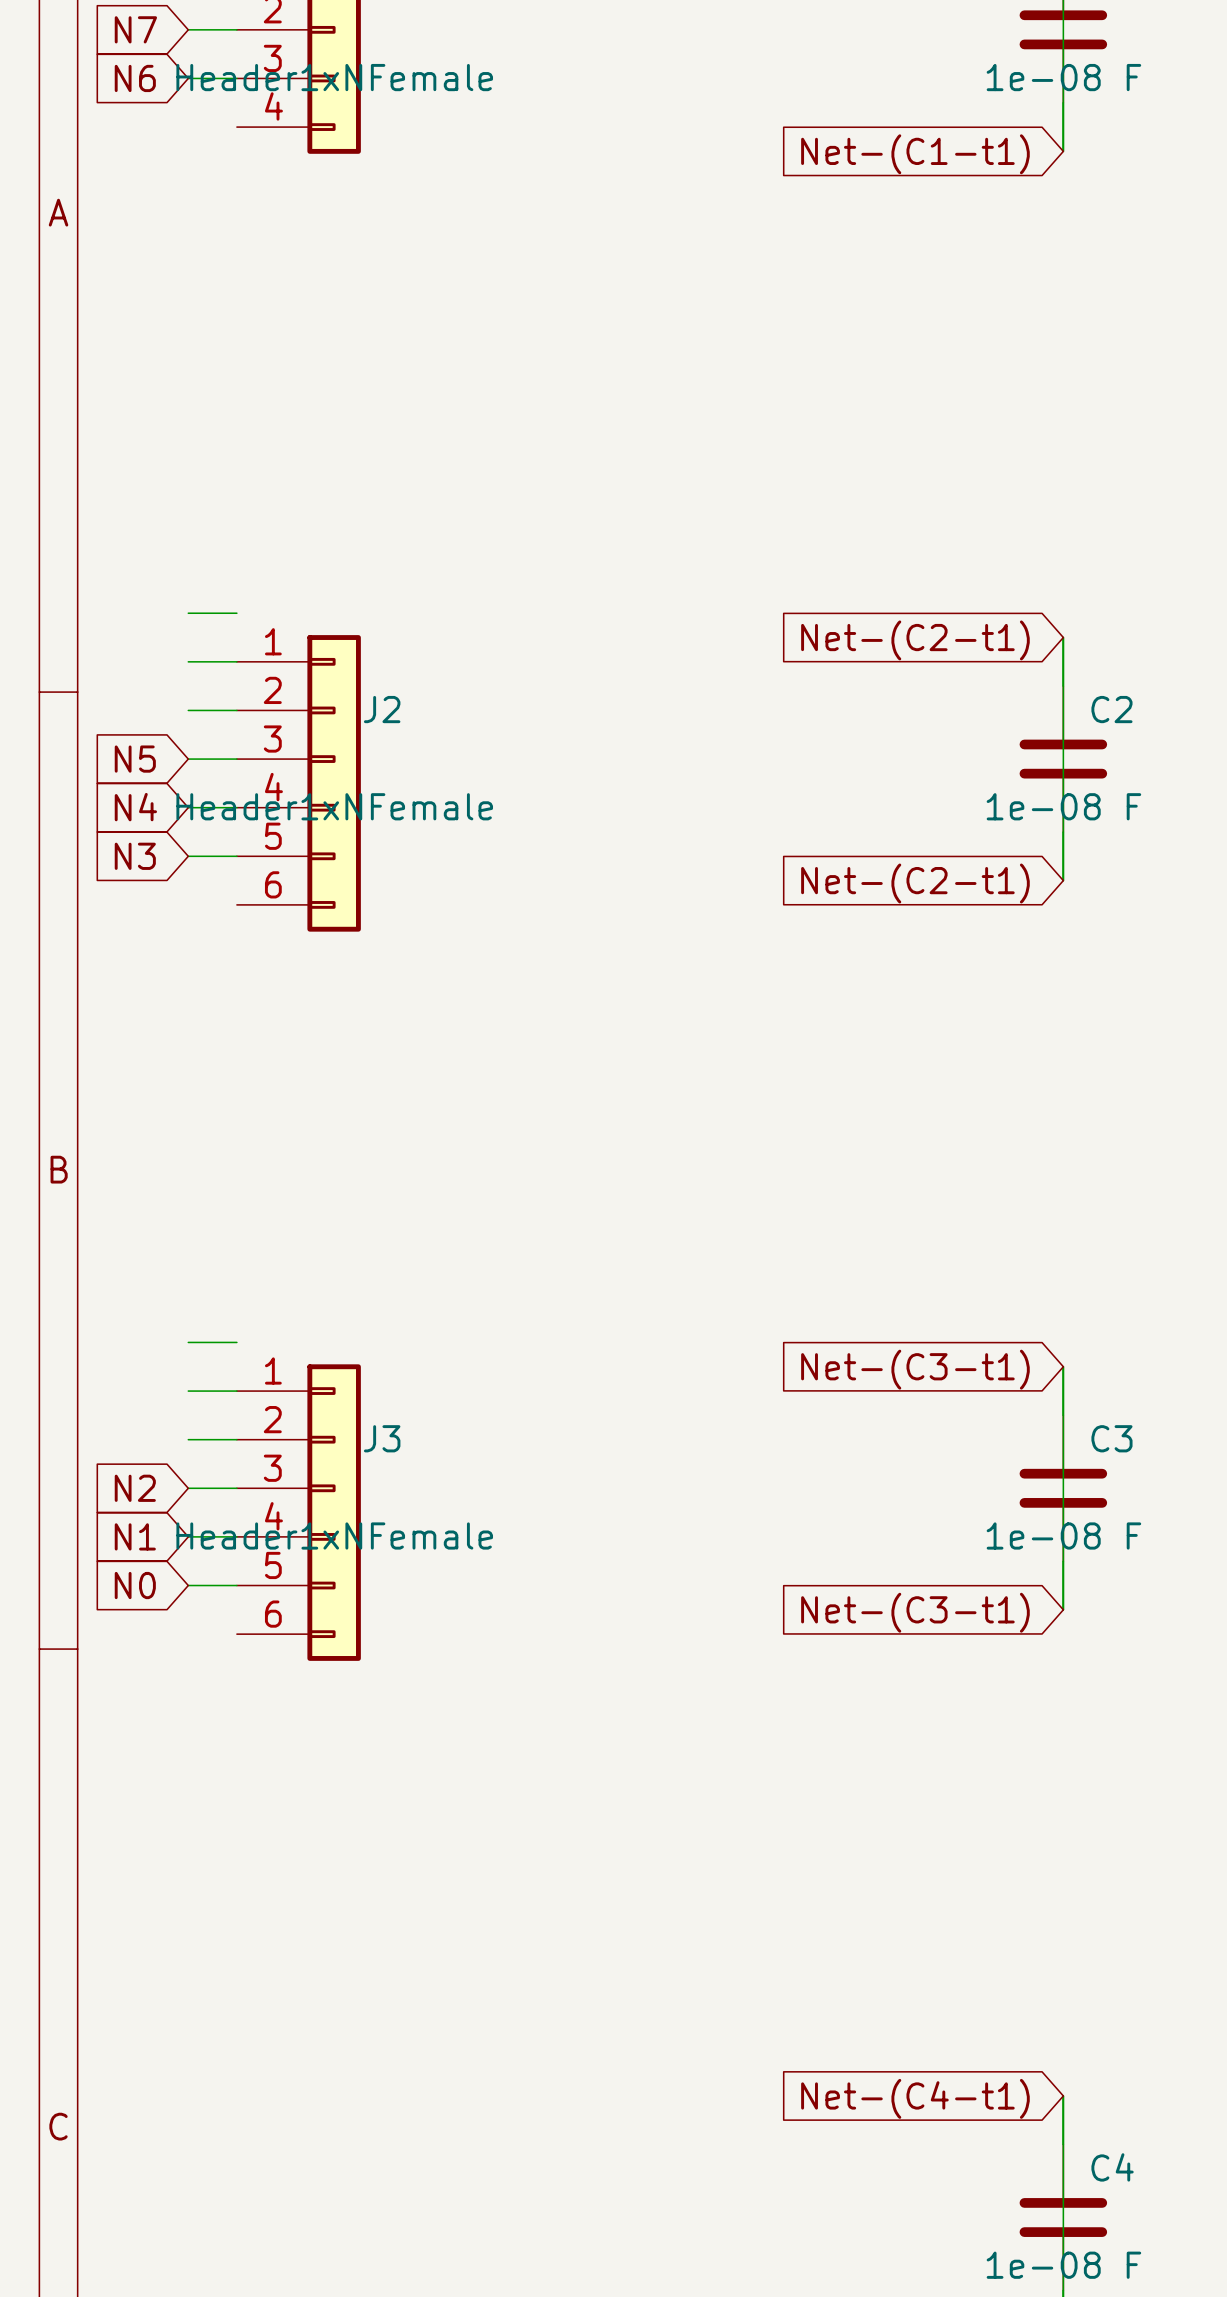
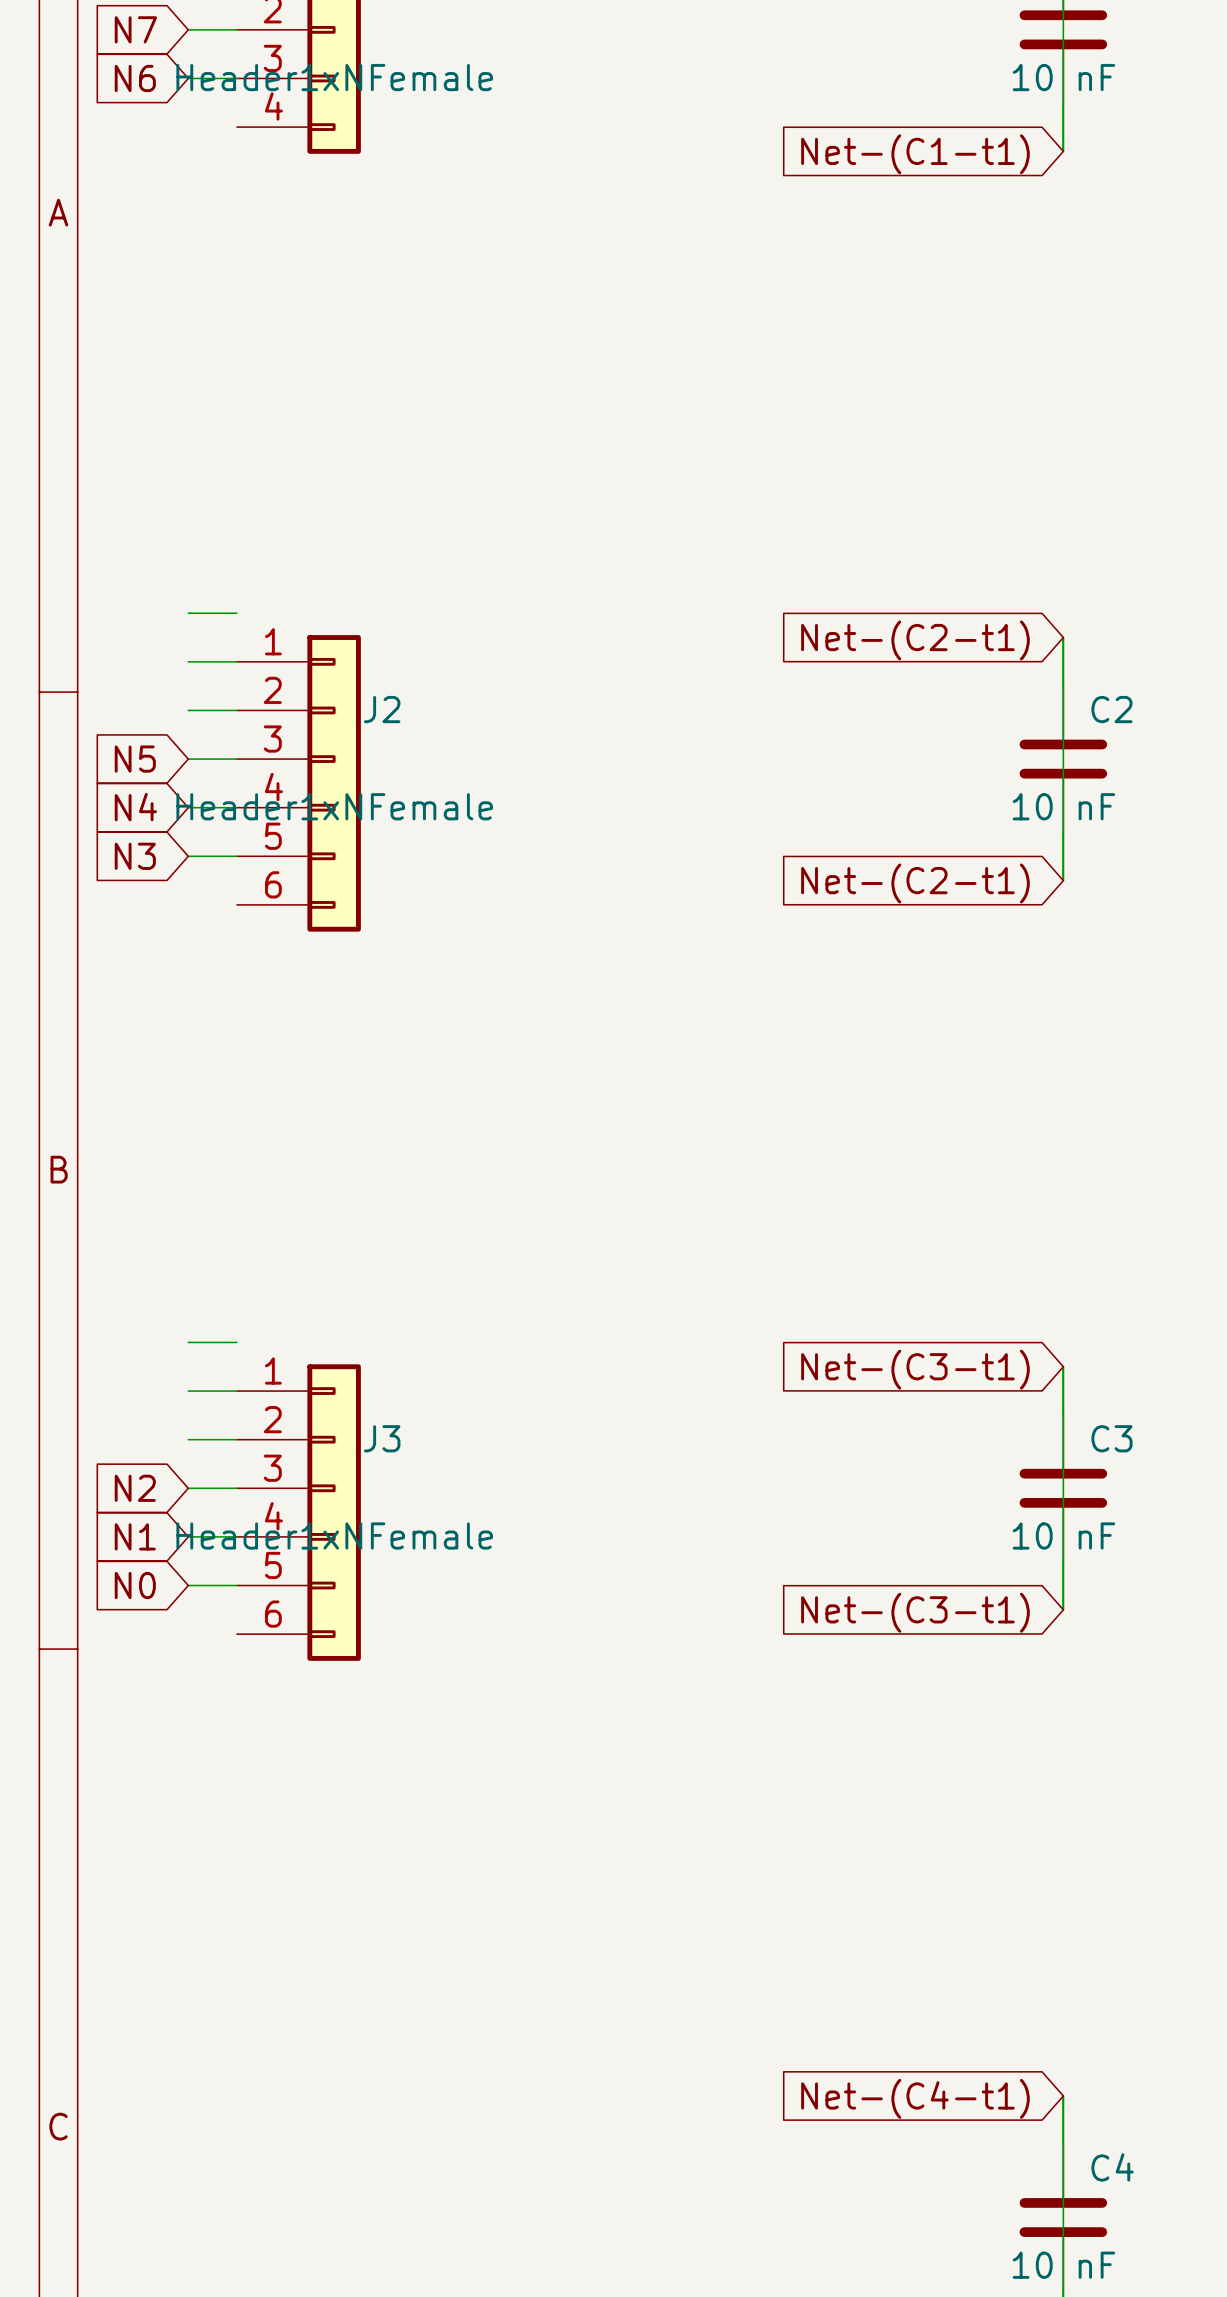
part value: 1e-08 F (1063, 77) -> 10 nF (1063, 77)
C2 value: 1e-08 F (1063, 806) -> 10 nF (1063, 806)
C3 value: 1e-08 F (1063, 1536) -> 10 nF (1063, 1536)
C4 value: 1e-08 F (1063, 2265) -> 10 nF (1063, 2265)

